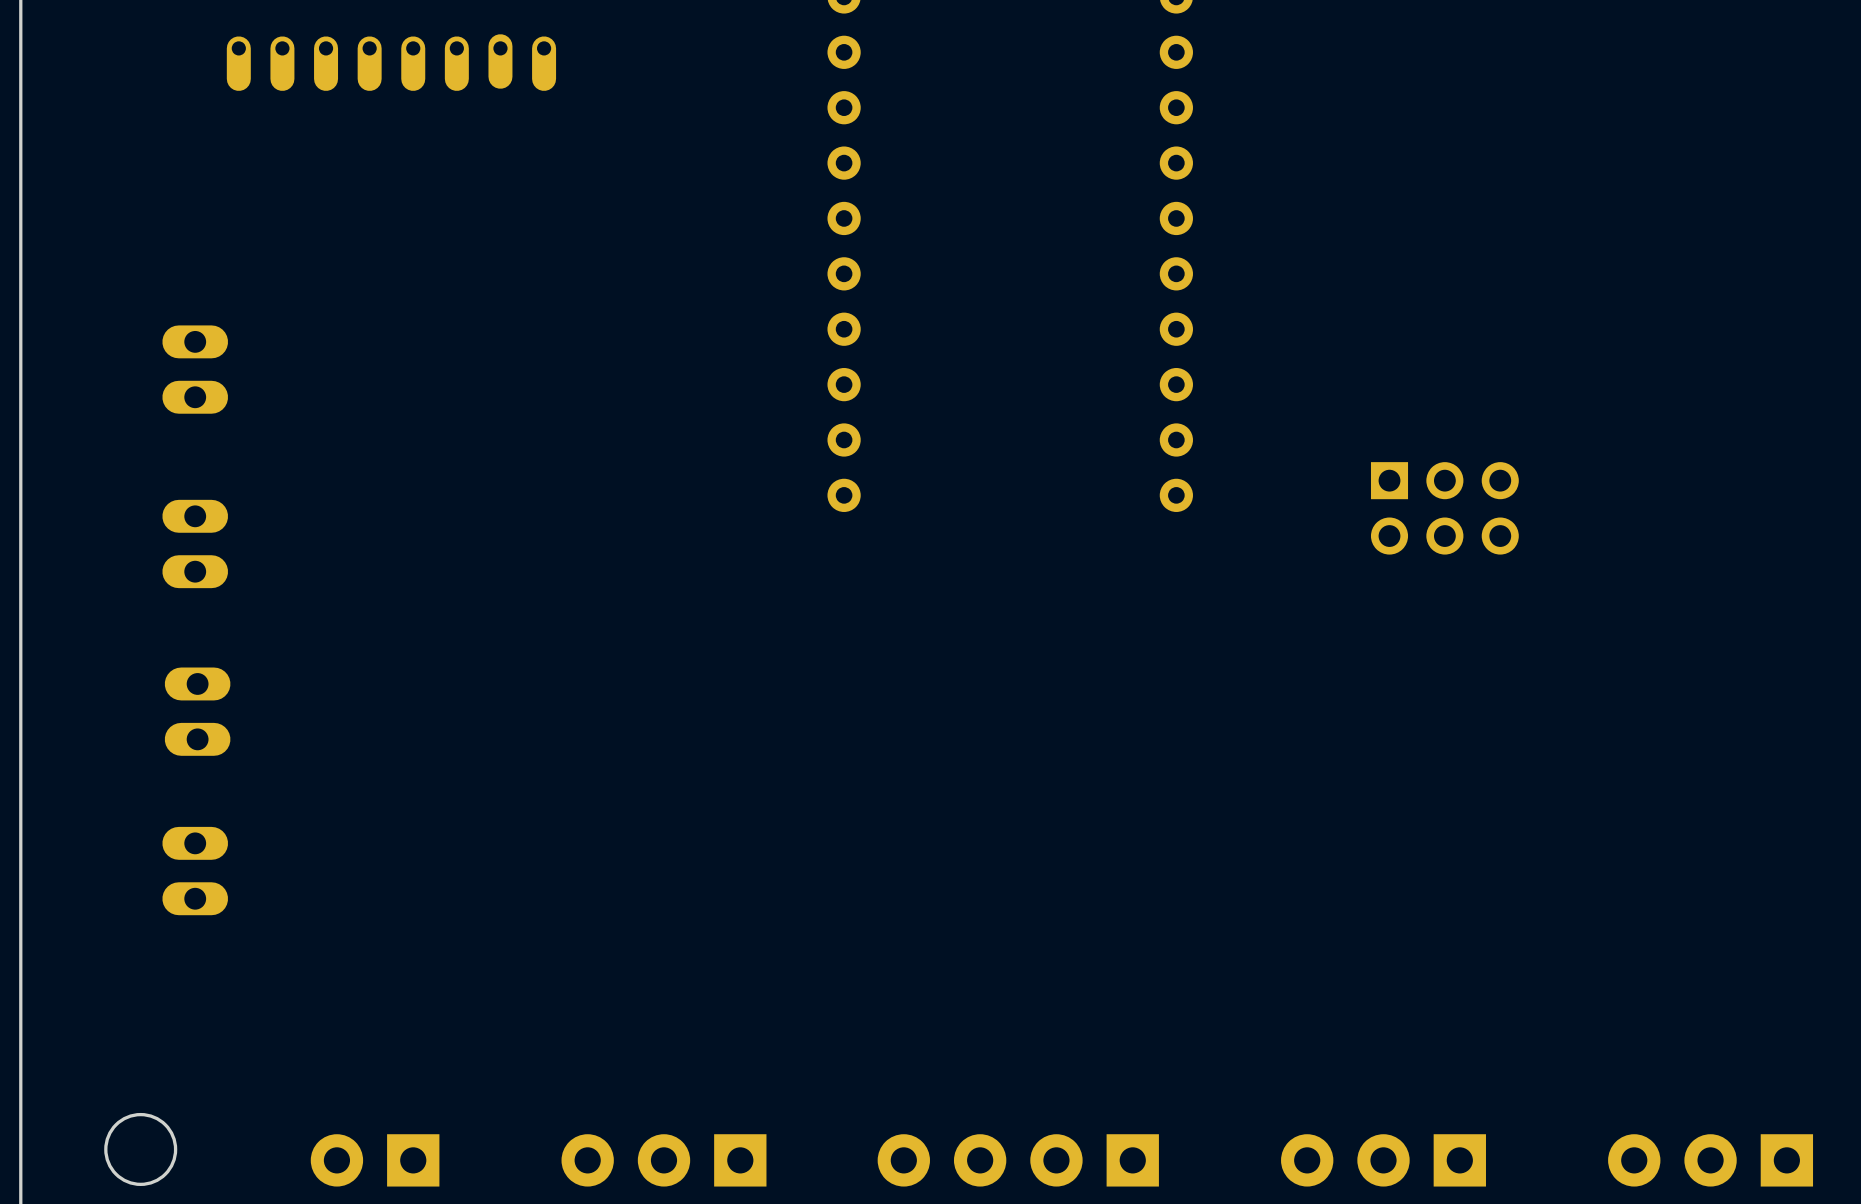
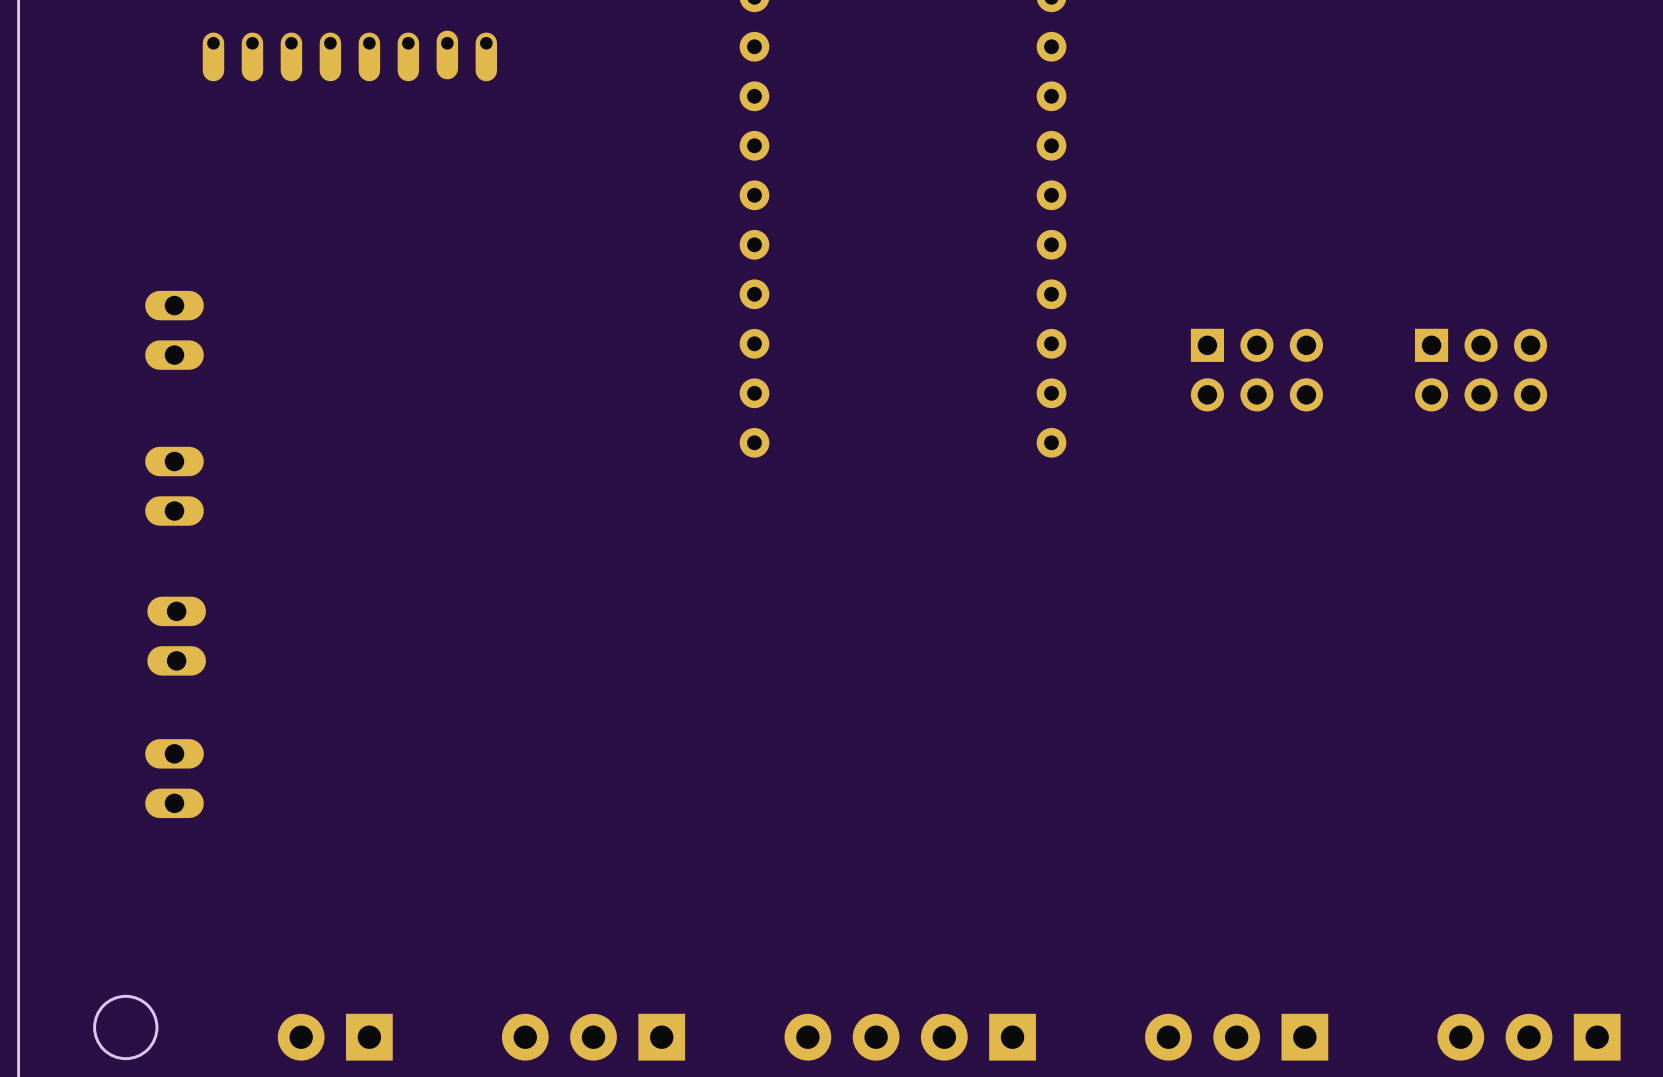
part: none -> (1481, 370)
part position: (1444, 508) -> (1256, 370)

